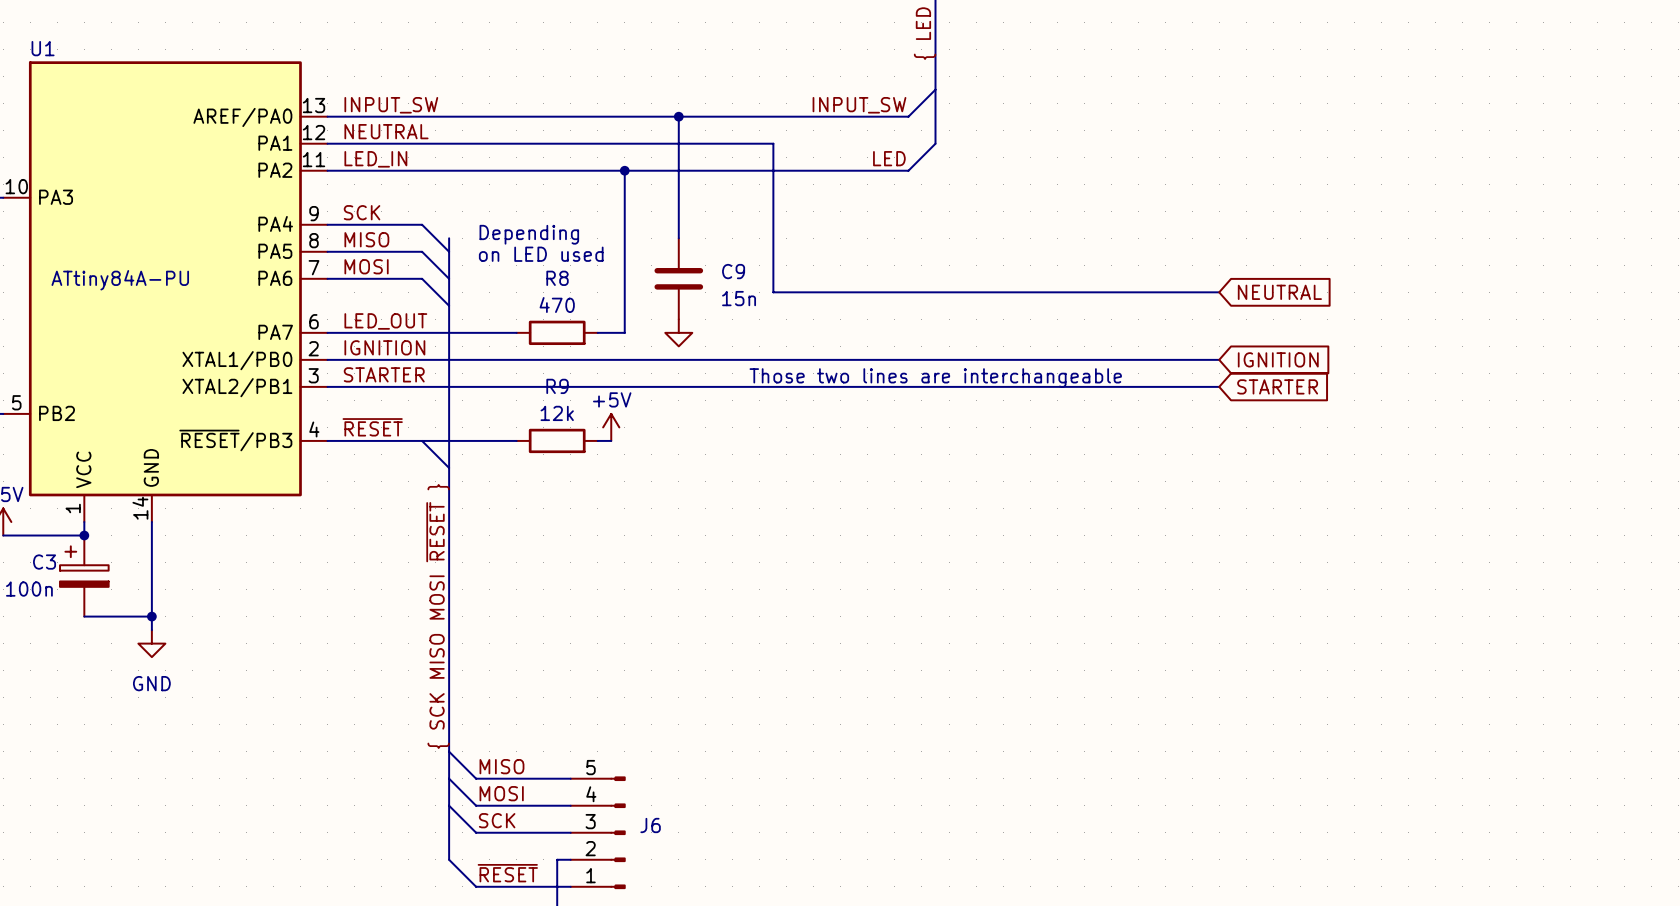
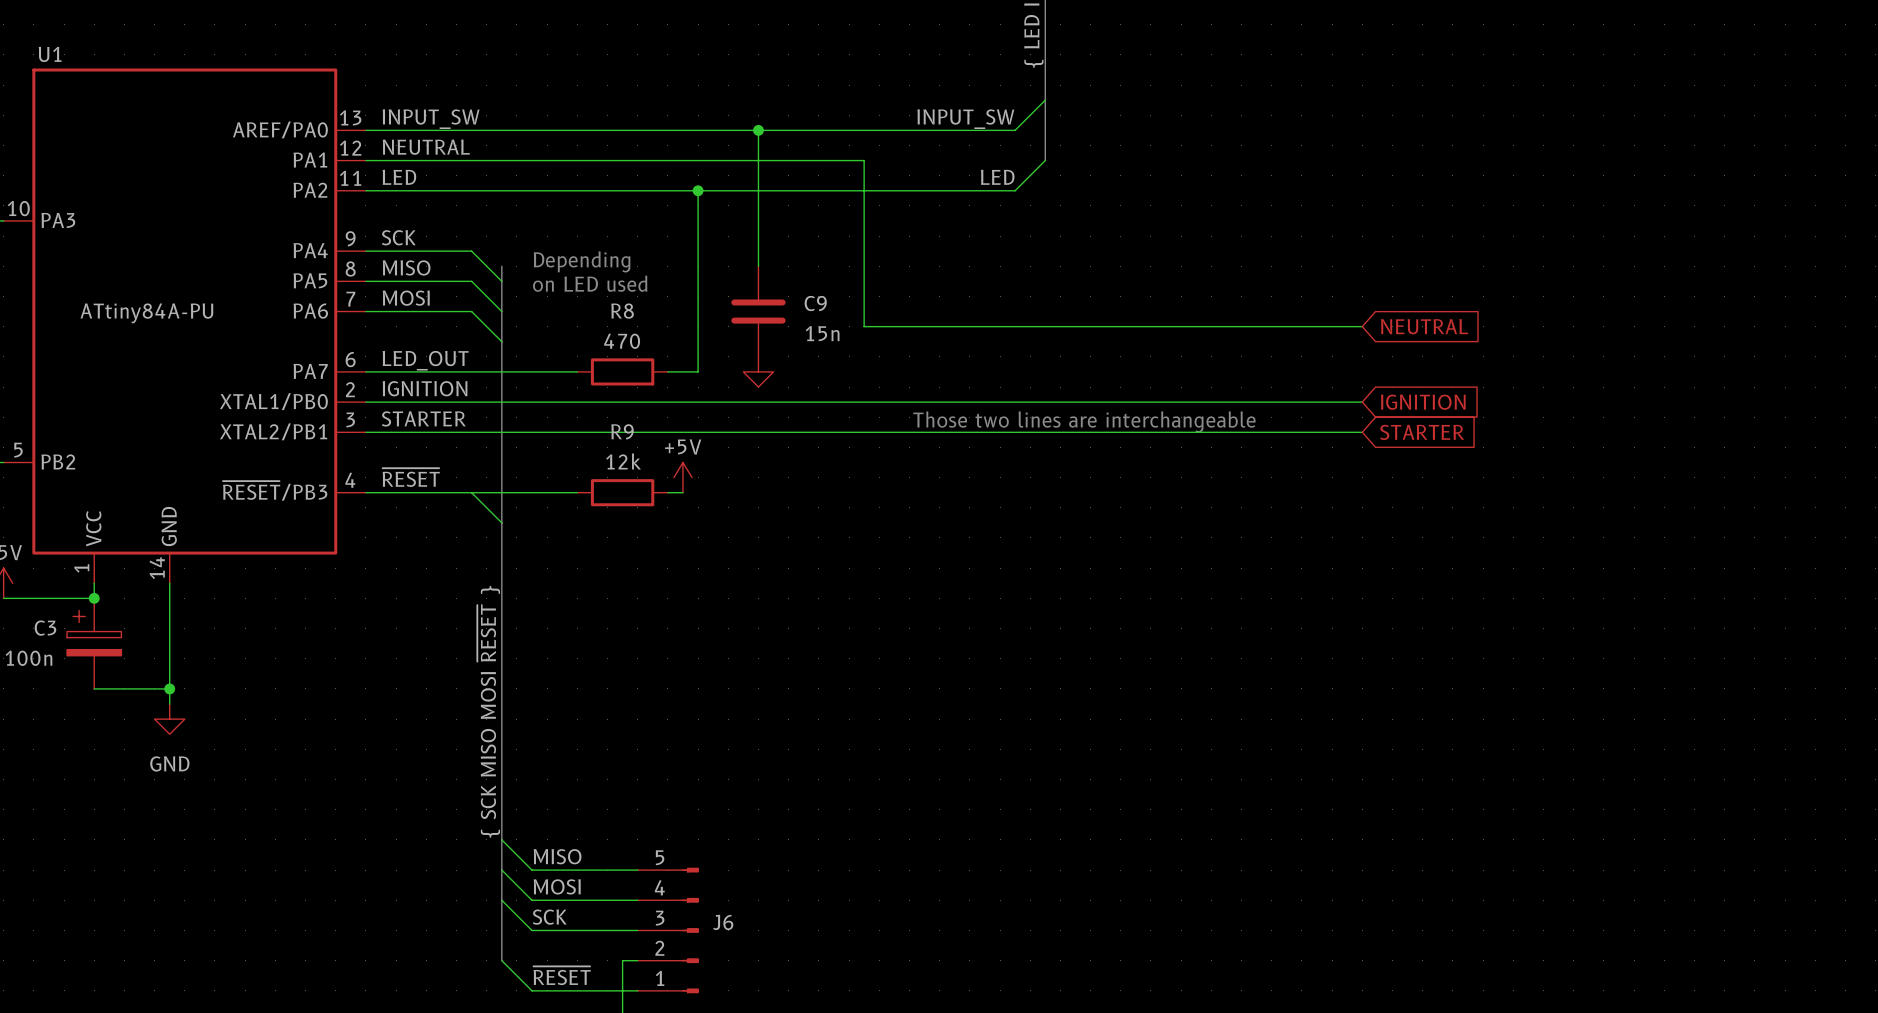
label: LED_IN (375, 159) -> LED (399, 177)

